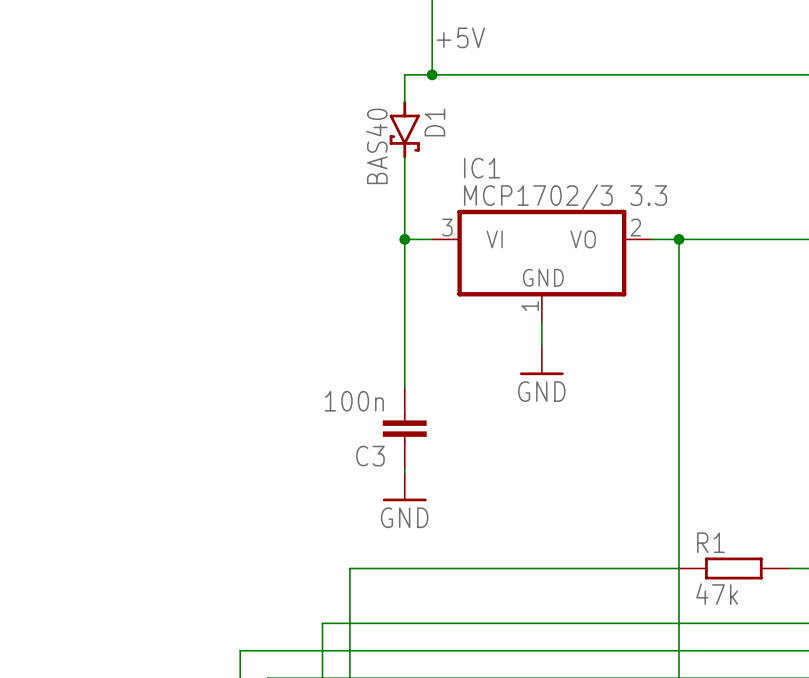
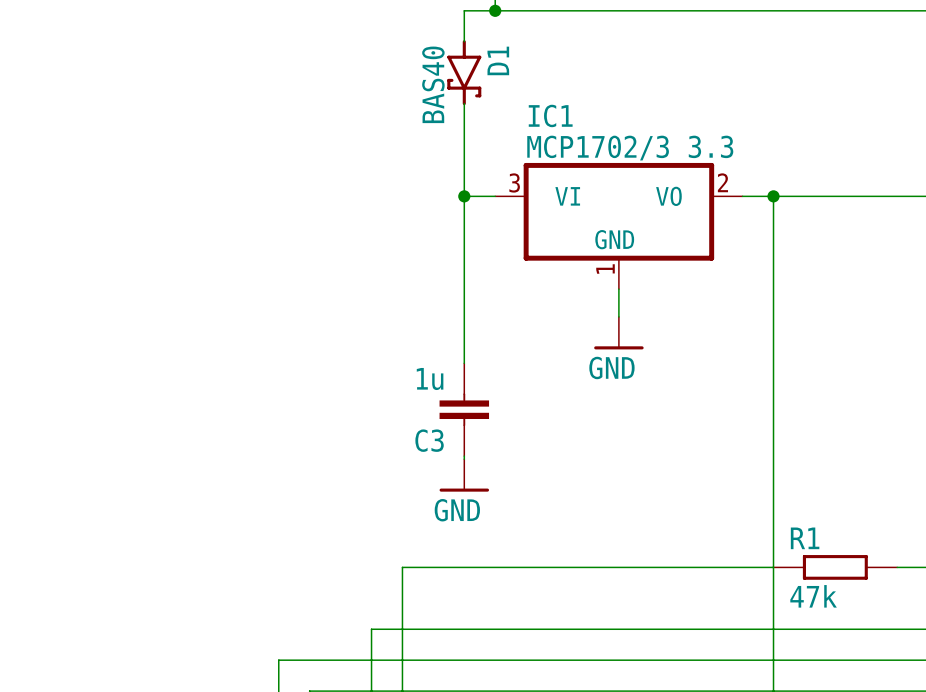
C3 value: 100n (354, 401) -> 1u (430, 379)

